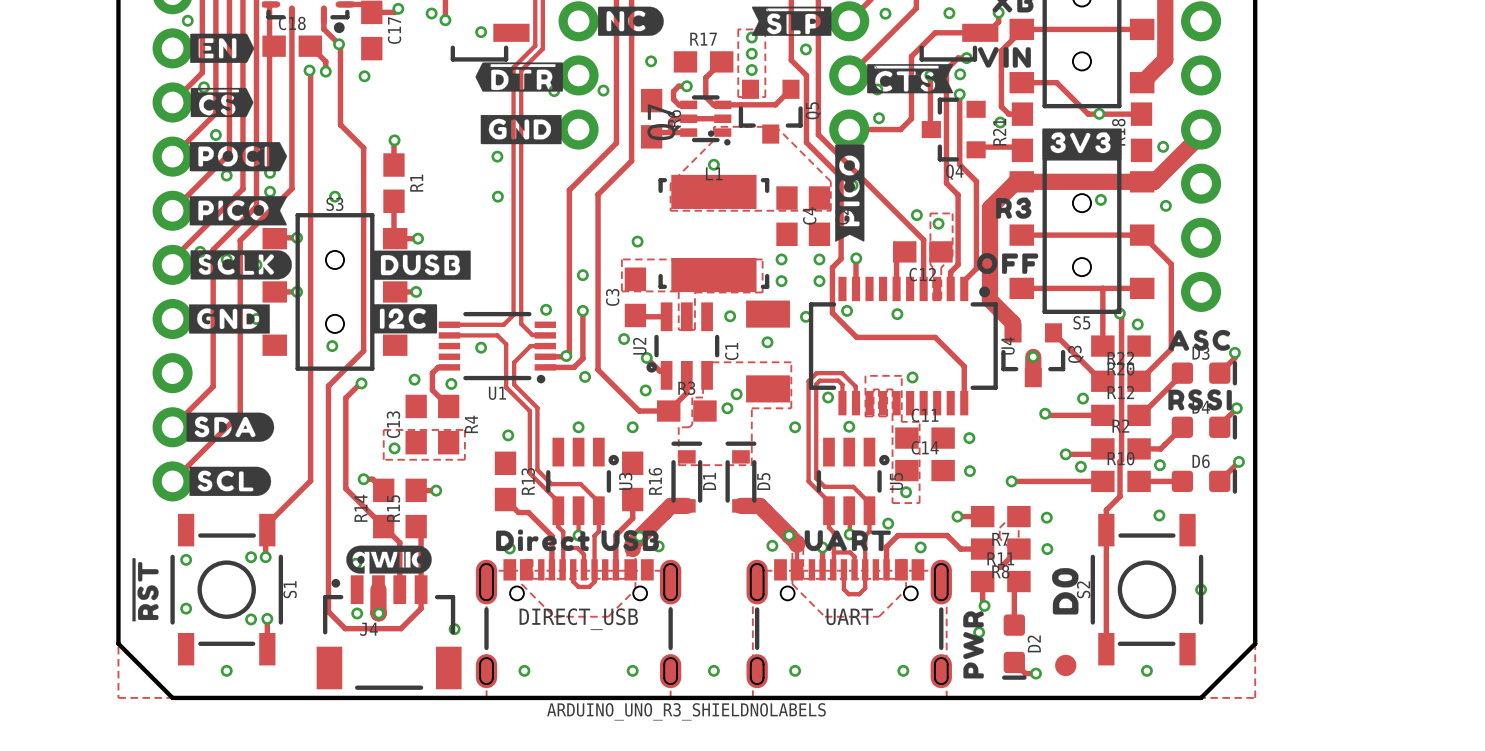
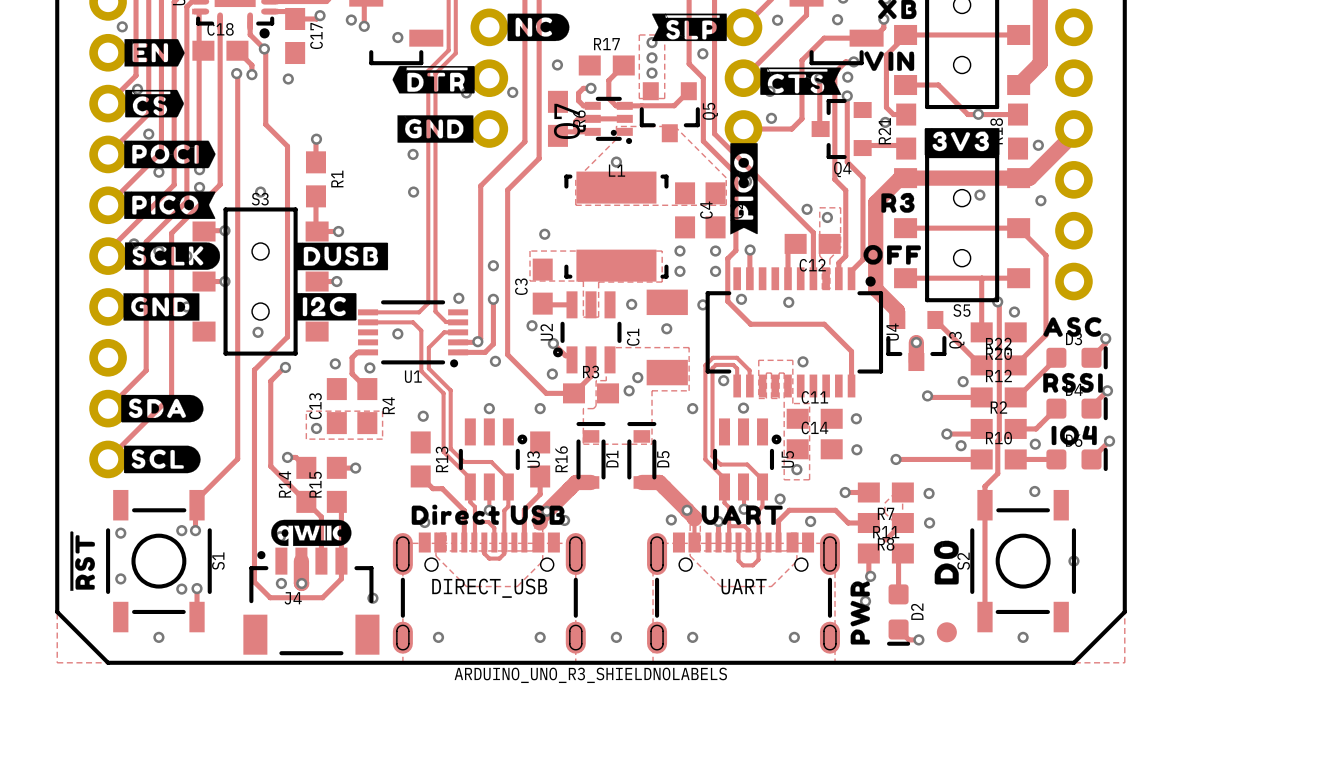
drawing: none -> [1051, 425, 1097, 446]

